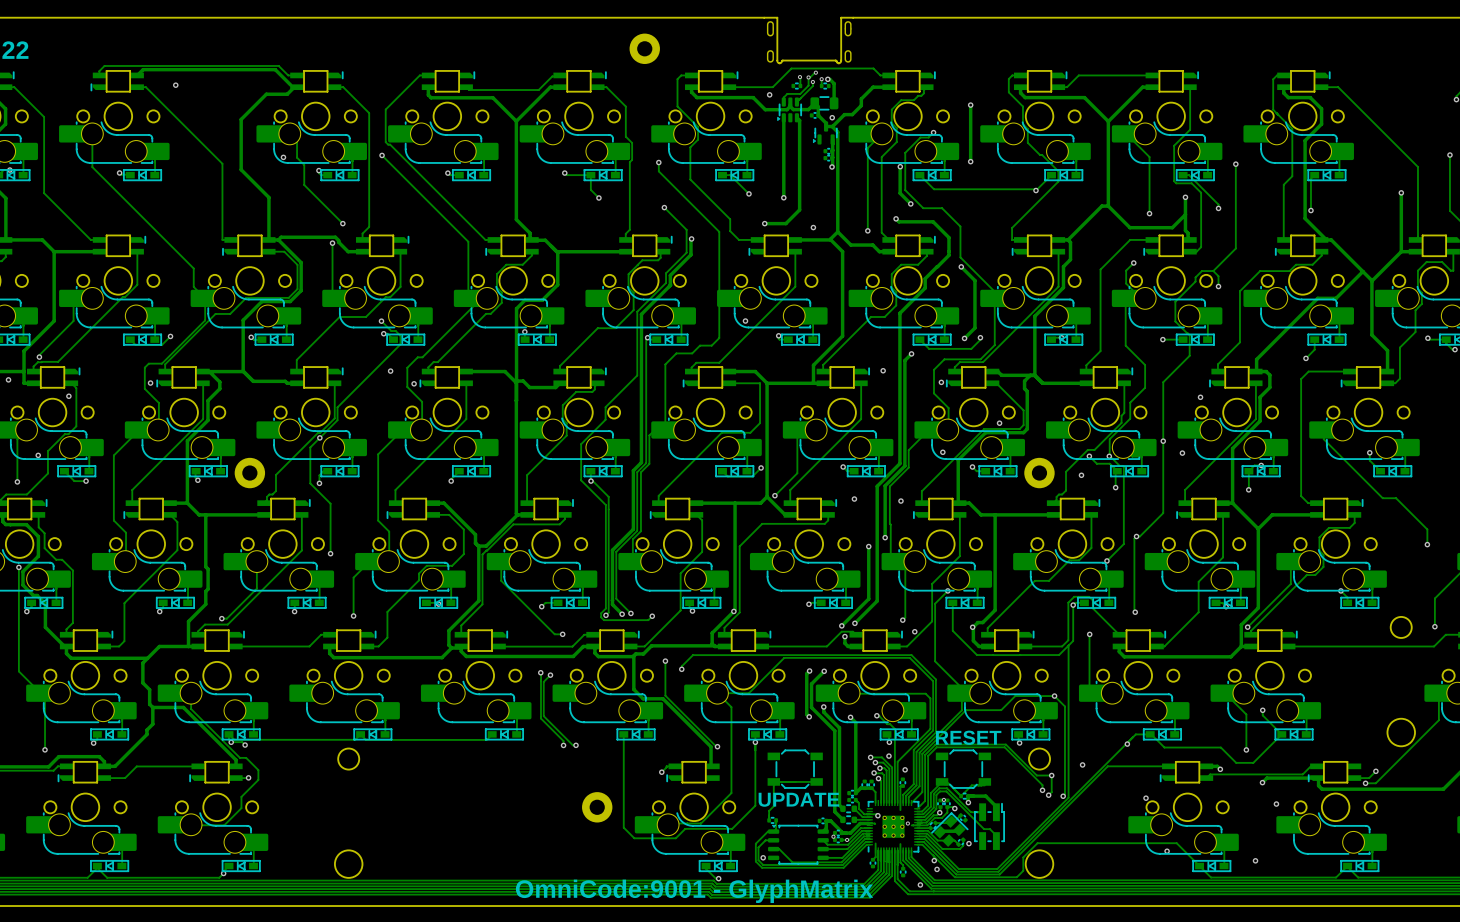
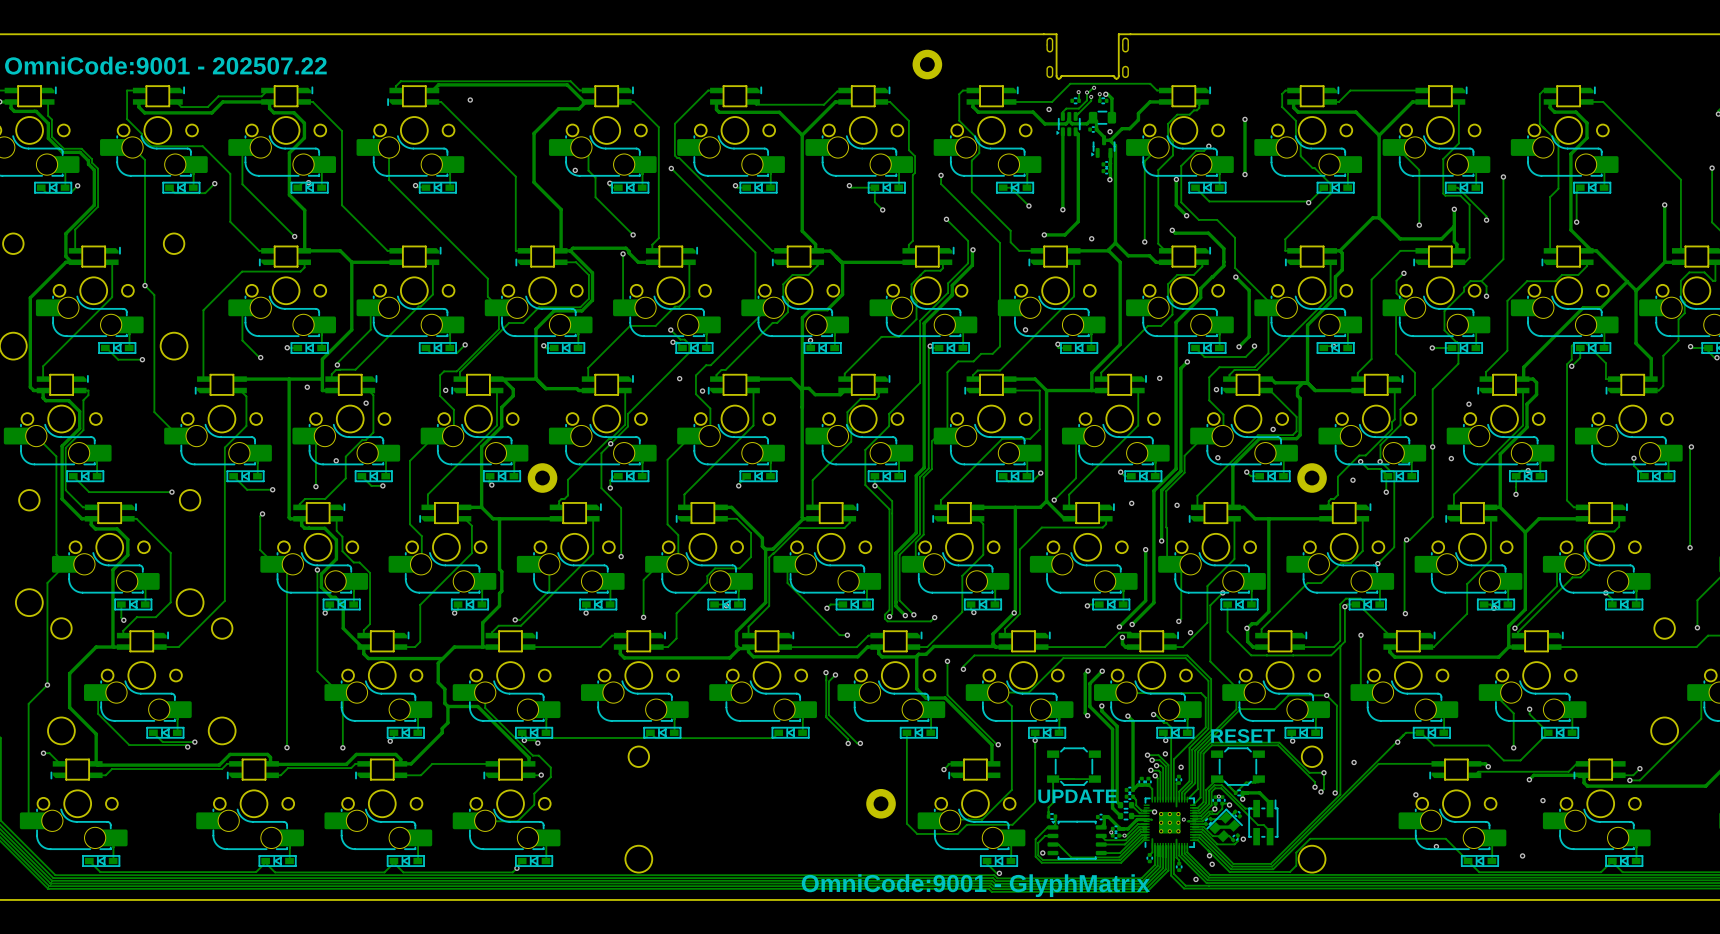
track: (1341, 371) (1308, 371) (1301, 379) -> (1605, 379) (1605, 363) (1585, 342) (1575, 342) (1571, 346) (1571, 359) (1567, 364) (1567, 386)
track: (1323, 429) (1323, 439) (1382, 498) (1396, 498) (1427, 529) -> (1691, 446) (1690, 533)
via: none -> (1691, 446)

